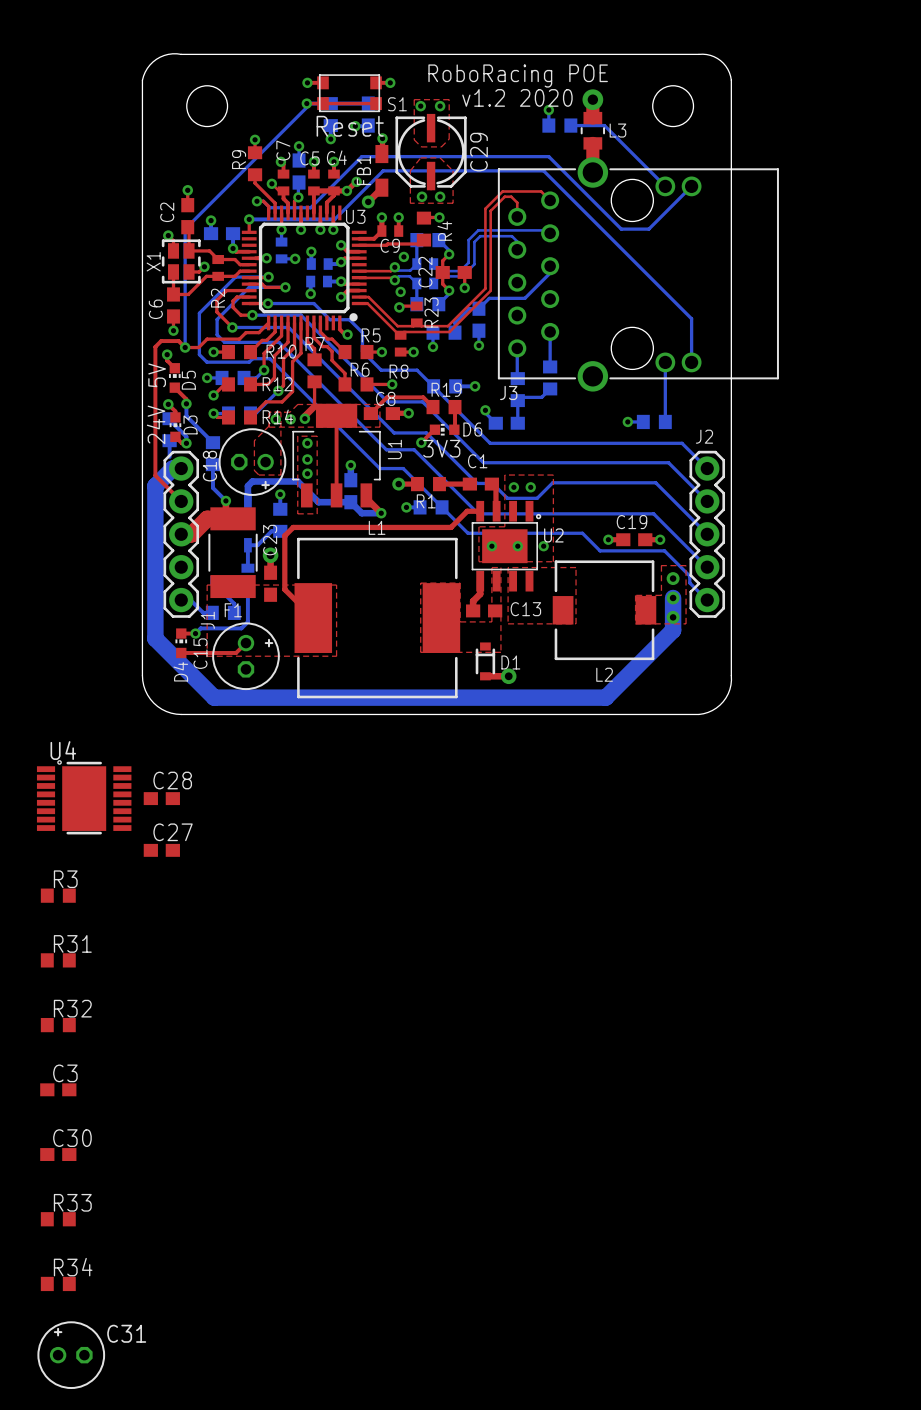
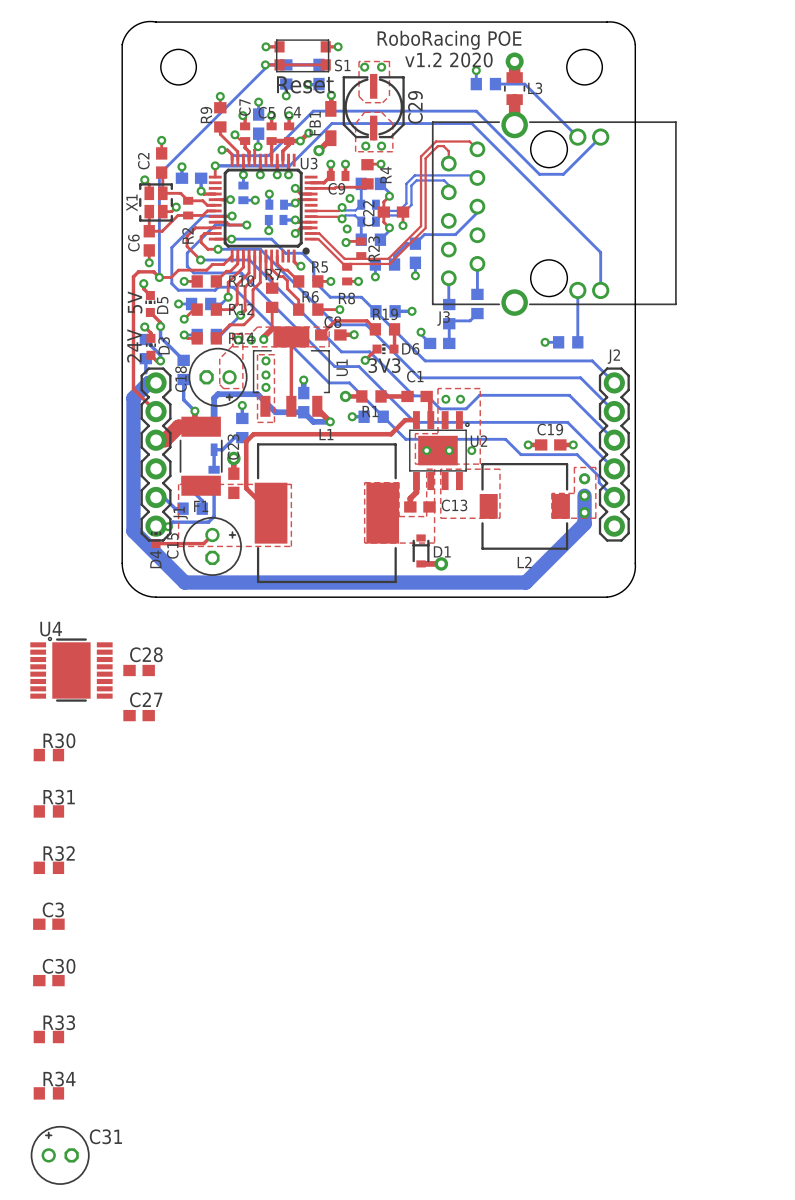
J1 footprint: [163, 450, 200, 618] -> [140, 367, 172, 542]
J2 footprint: [689, 450, 726, 618] -> [598, 367, 630, 542]
R3 name: R3 (65, 879) -> R30 (59, 740)

